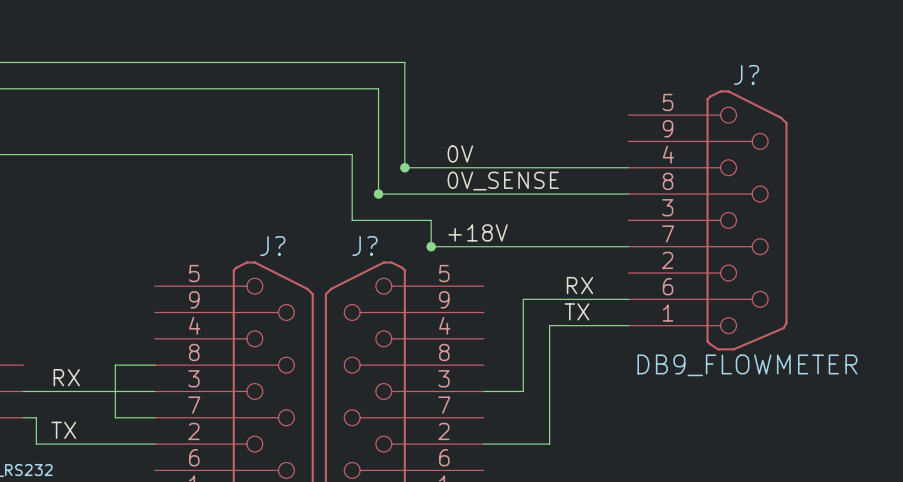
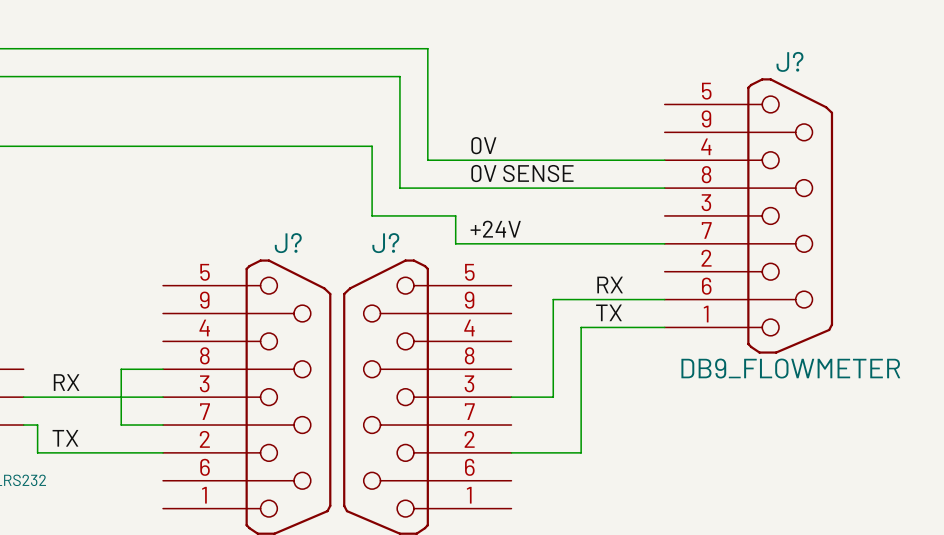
junction: (404, 167) -> none
label: 0V_SENSE (503, 181) -> 0V SENSE (522, 173)
junction: (378, 194) -> none
label: +18V (478, 232) -> +24V (495, 229)
junction: (431, 246) -> none

